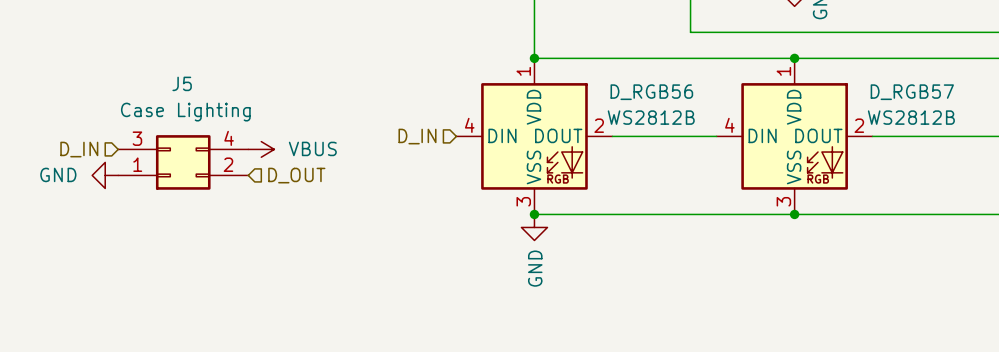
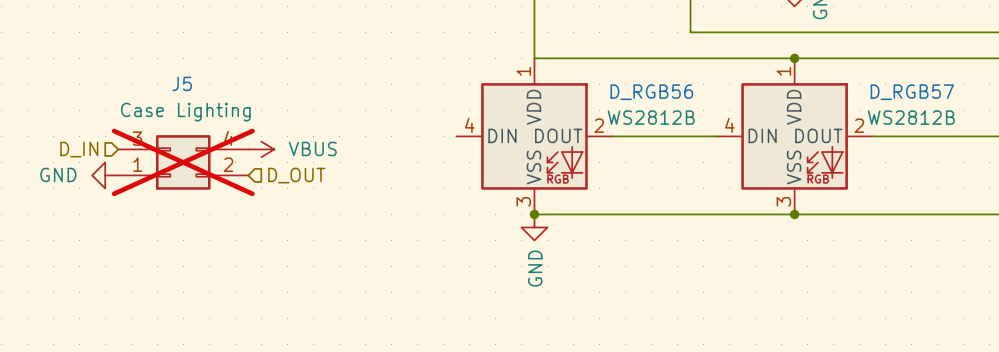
junction: (534, 58) -> none
hierarchical label: D_IN (417, 136) -> none
J5 do-not-place cross: none -> (183, 162)

